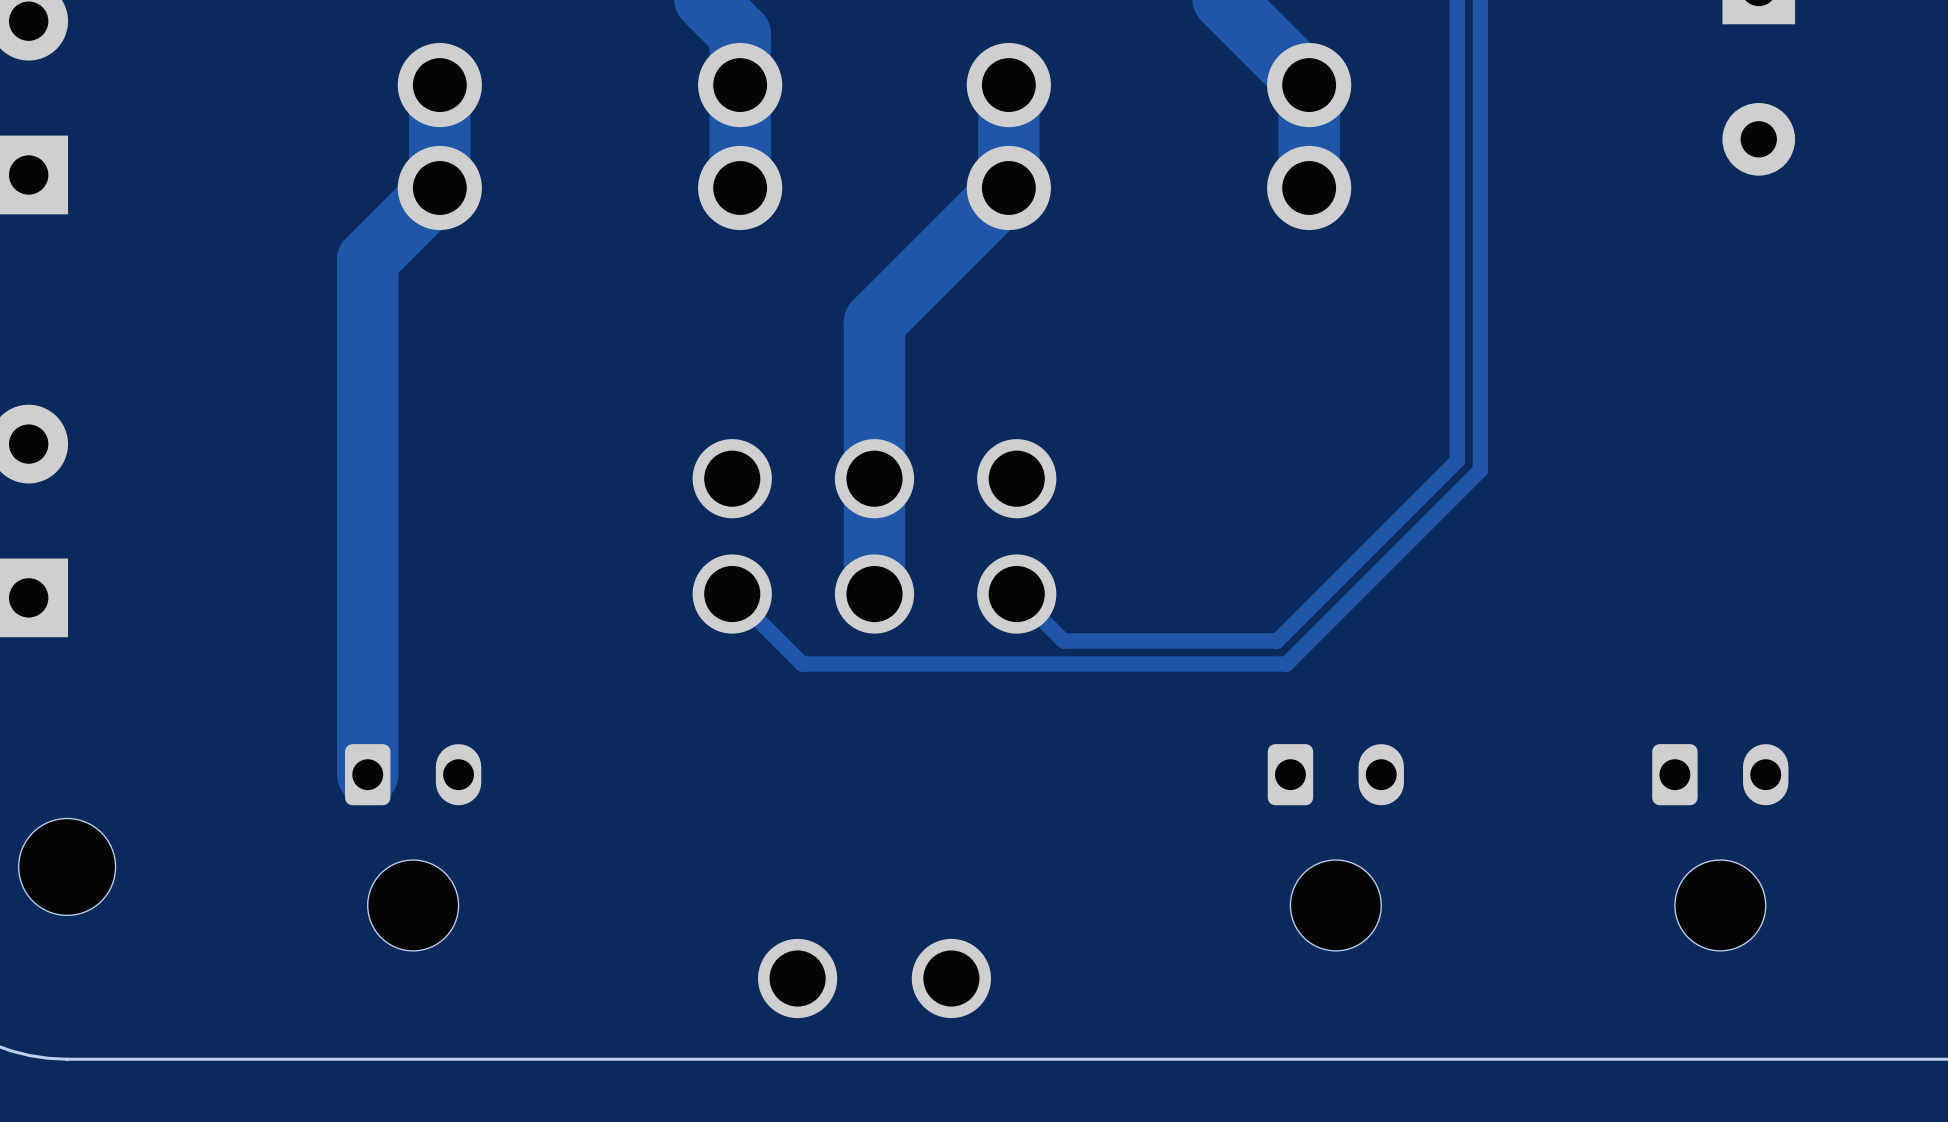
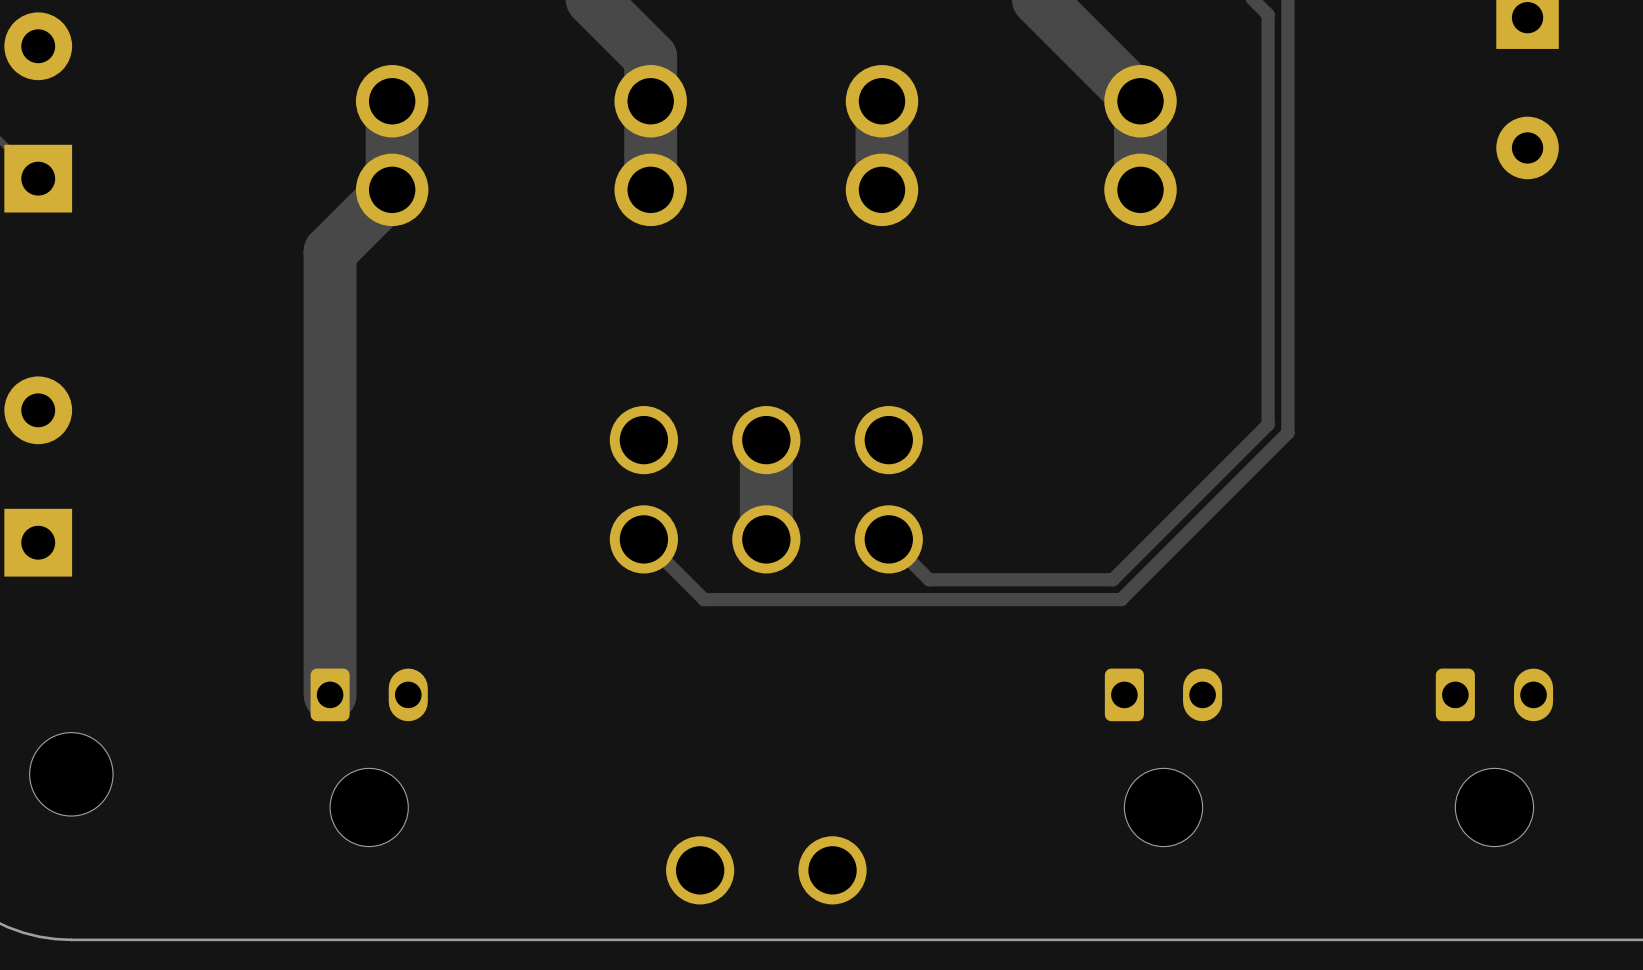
track: (1008, 187) (874, 322) (874, 478) -> none

